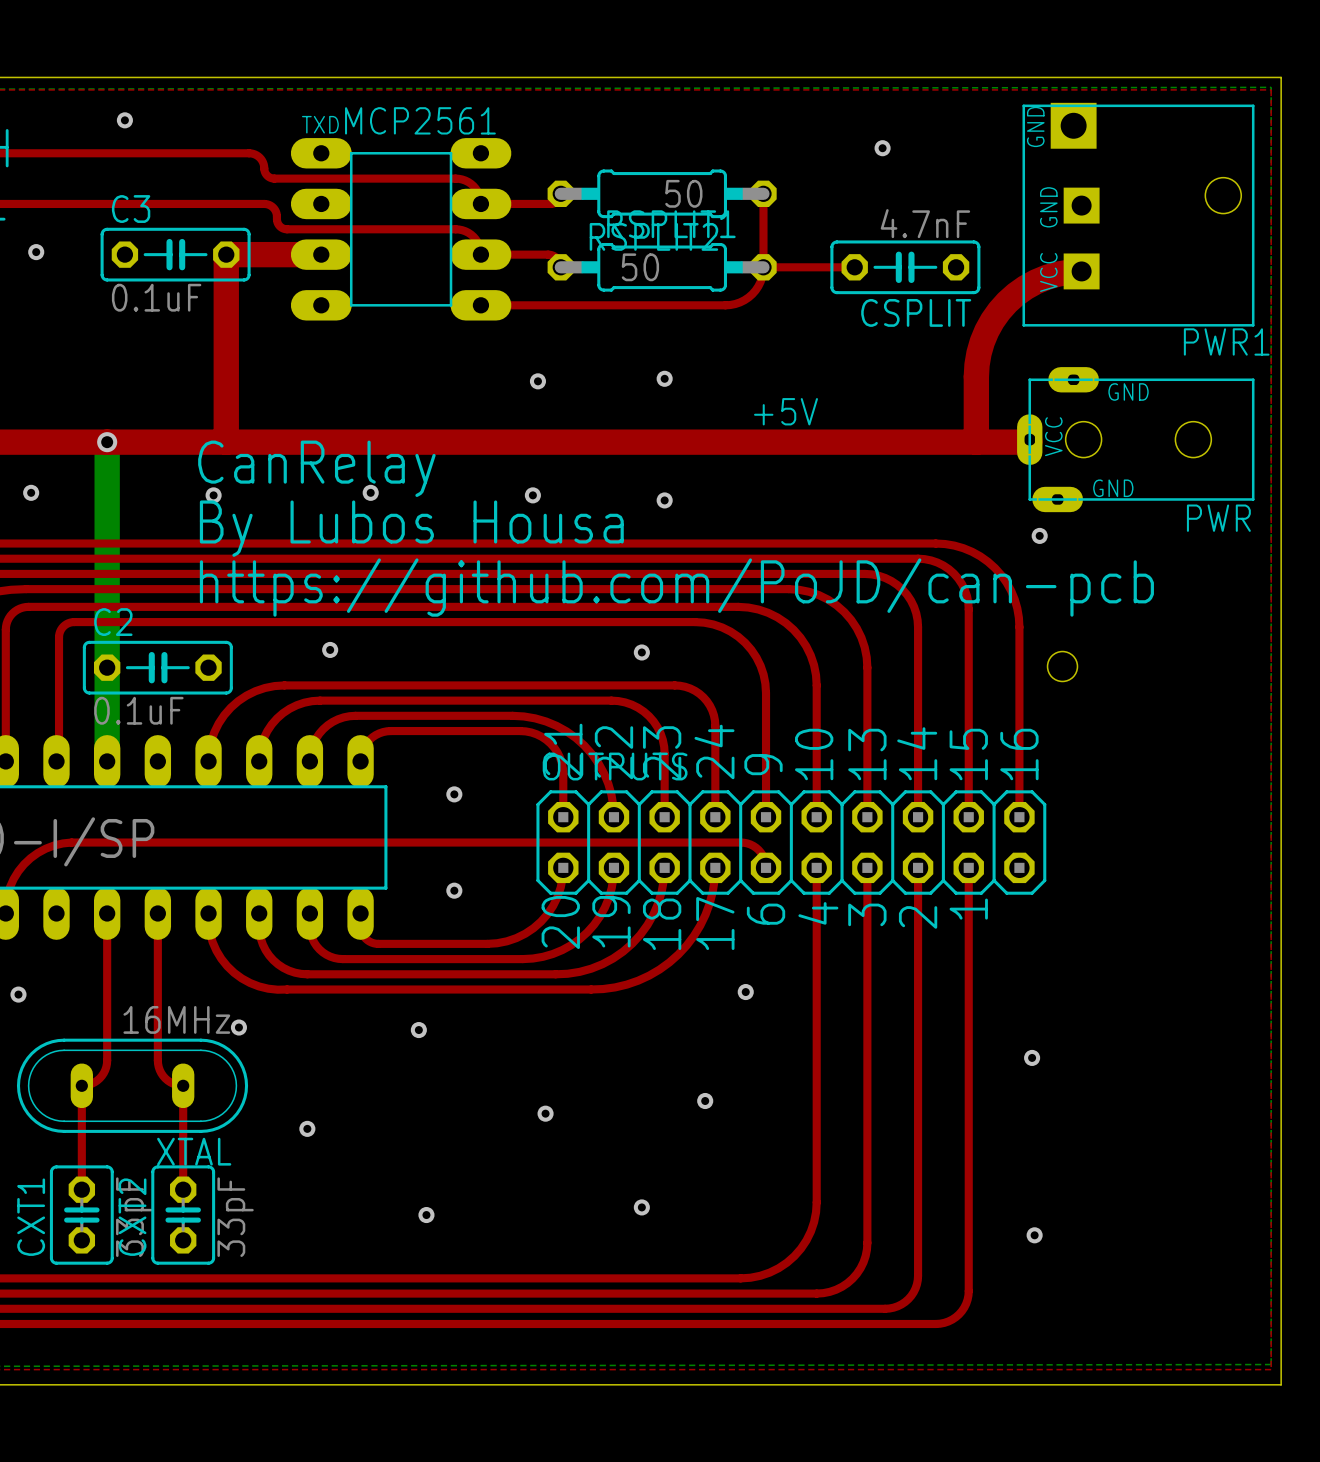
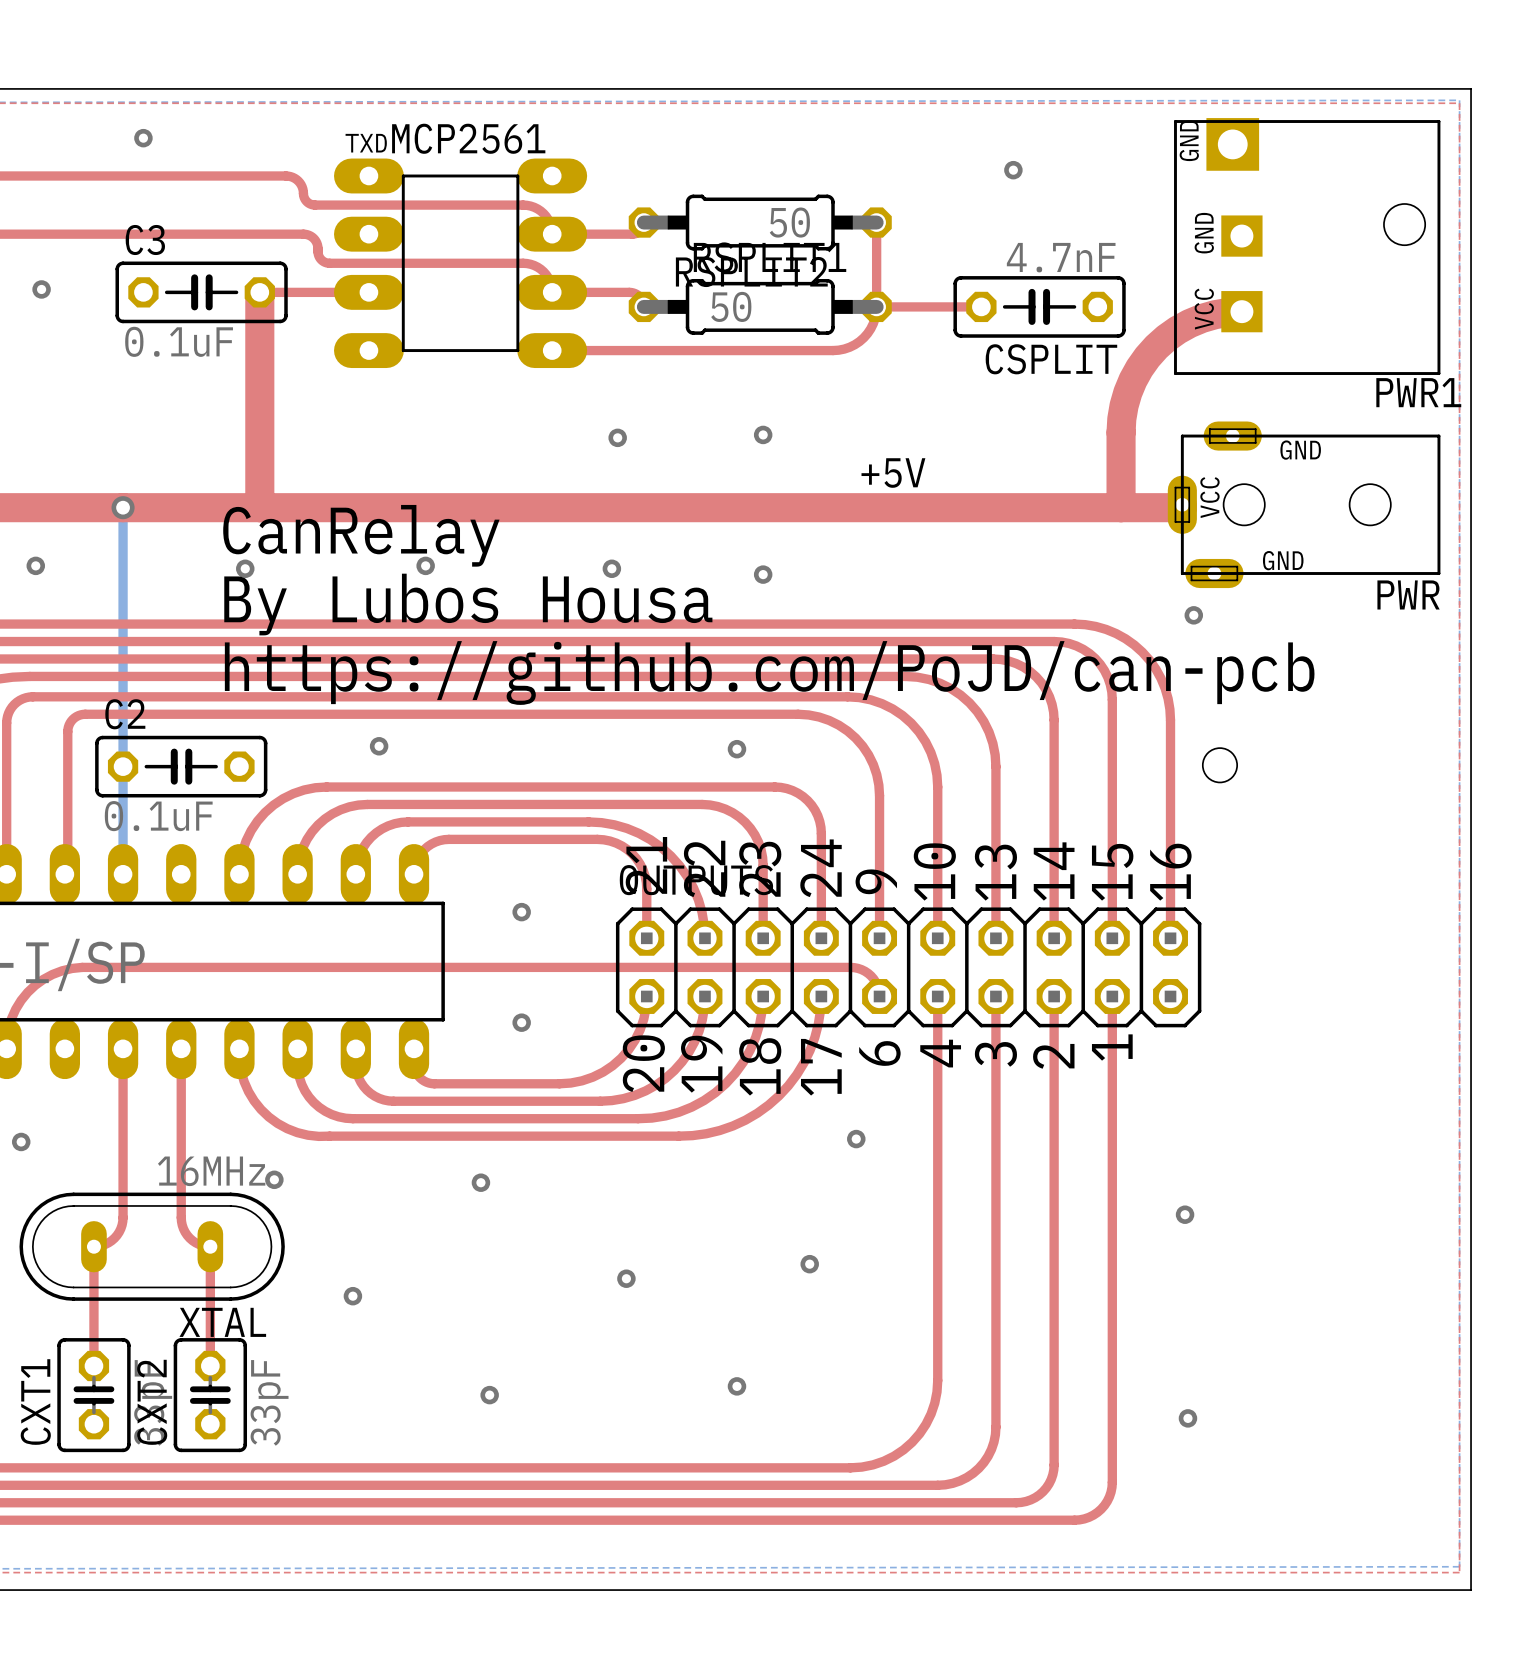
top track width: thick (226, 254) (321, 254) -> thin (259, 292) (368, 292)
bottom track width: thick (107, 442) (107, 761) -> thin (123, 507) (123, 874)

